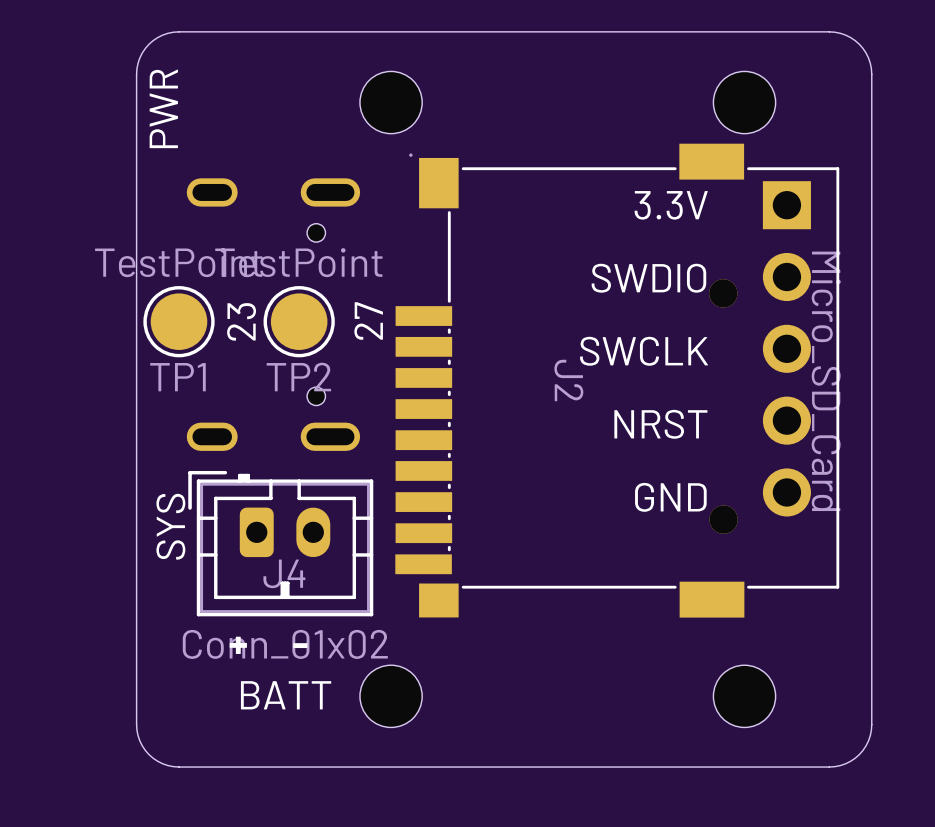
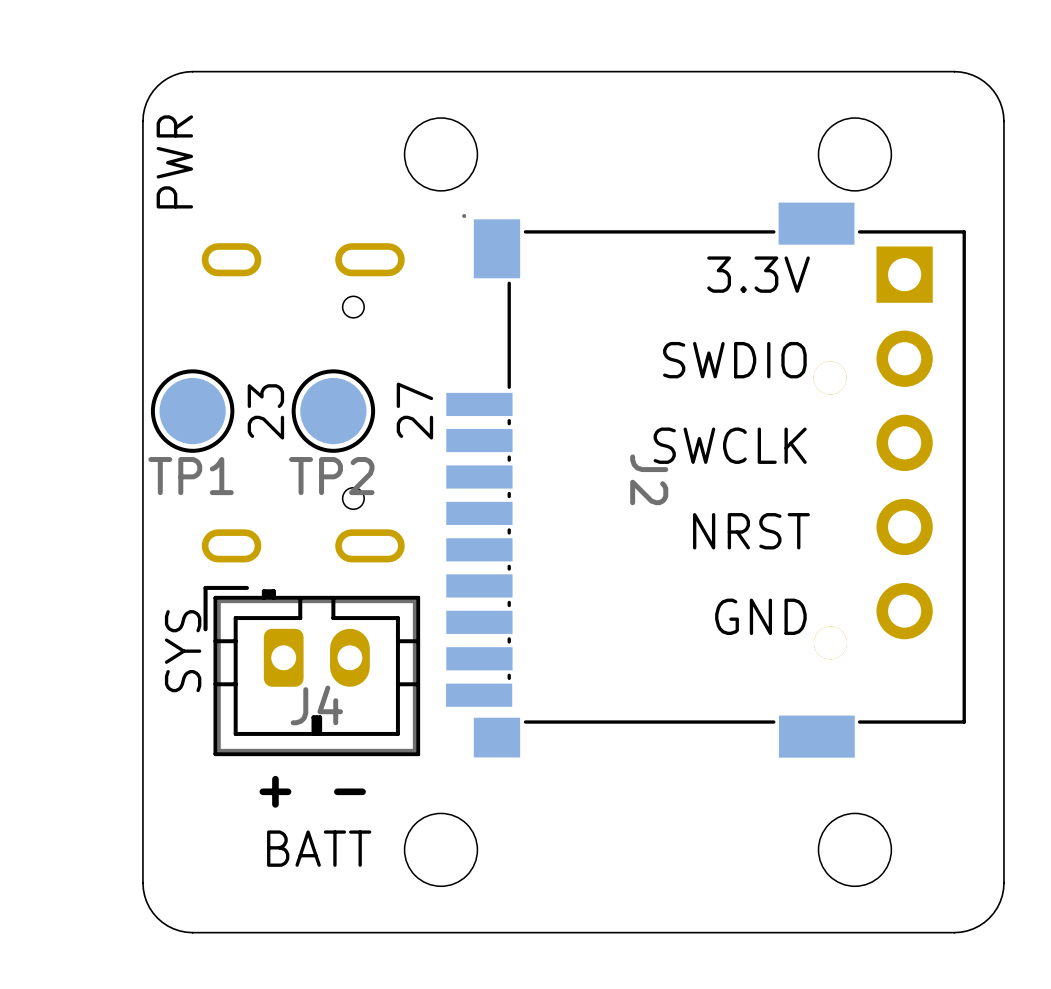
TP1 value: TestPoint (178, 262) -> none
TP2 value: TestPoint (298, 262) -> none
J2 value: Micro_SD_Card (826, 381) -> none
J4 value: Conn_01x02 (285, 644) -> none

